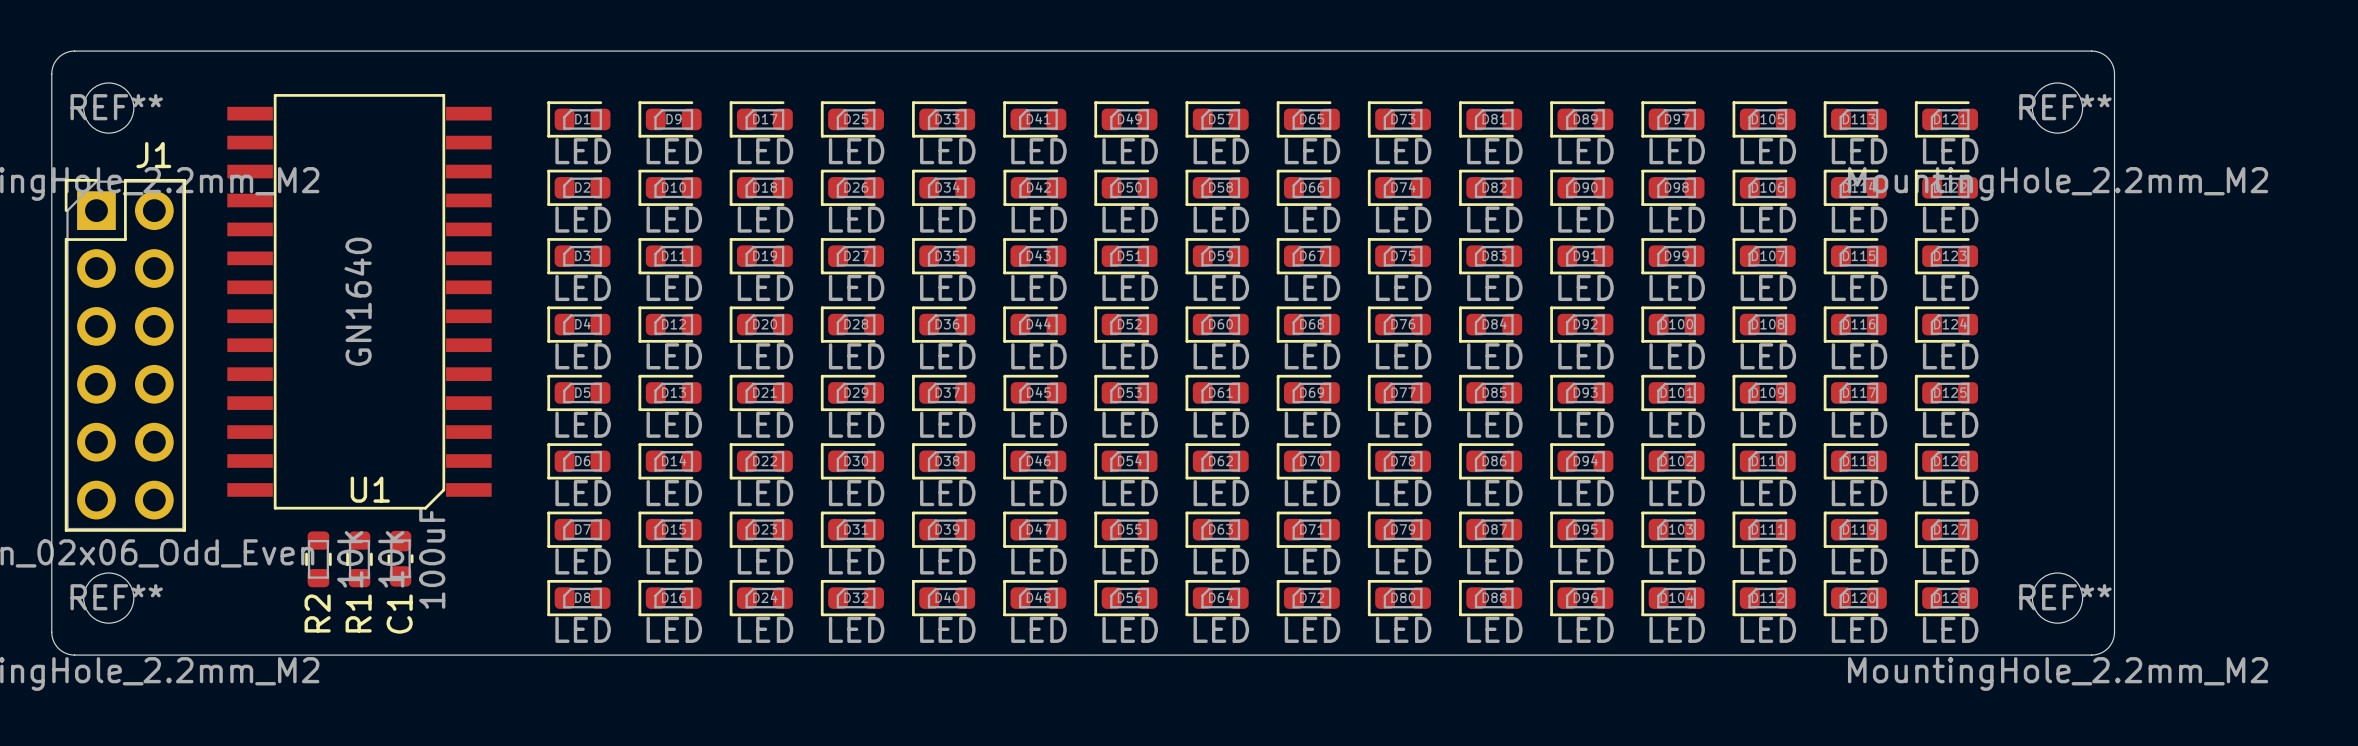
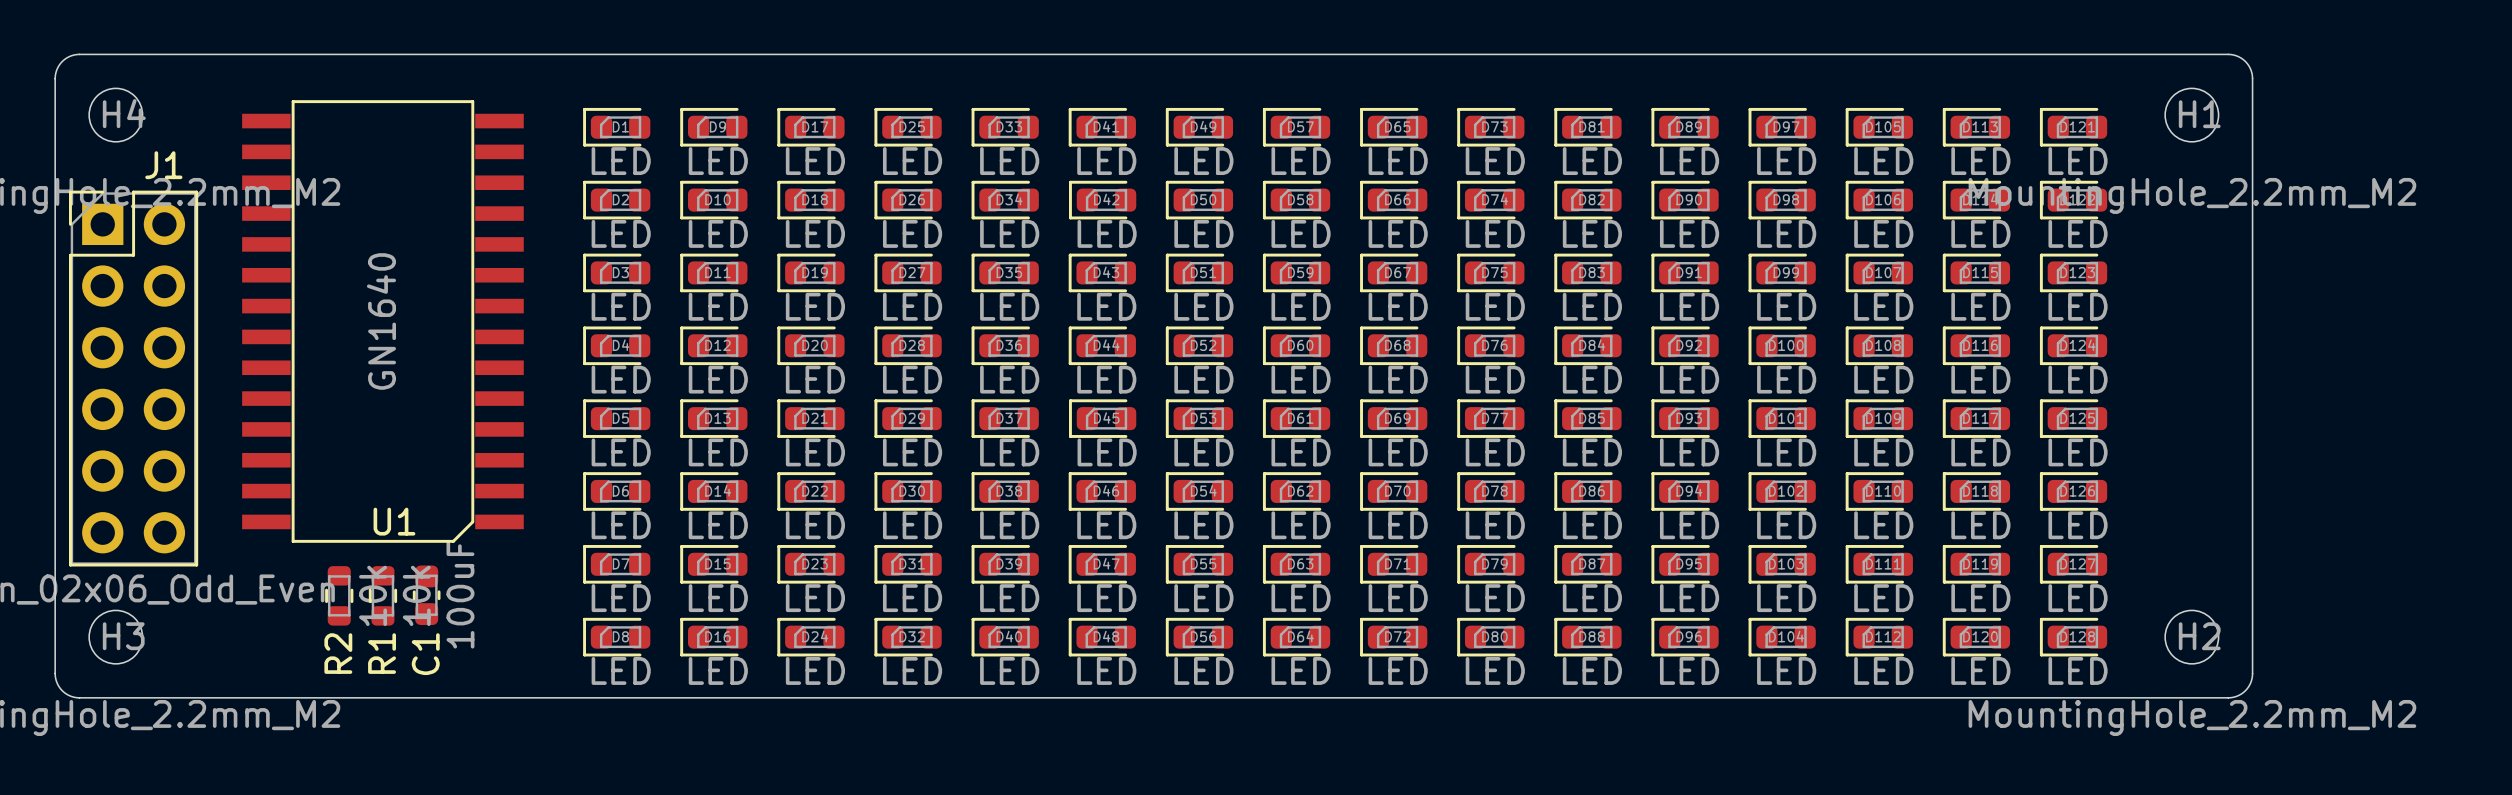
REF** name: REF** (116, 107) -> H4 (124, 113)
REF** name: REF** (2065, 107) -> H1 (2199, 114)
REF** name: REF** (116, 597) -> H3 (123, 636)
REF** name: REF** (2065, 597) -> H2 (2199, 636)

